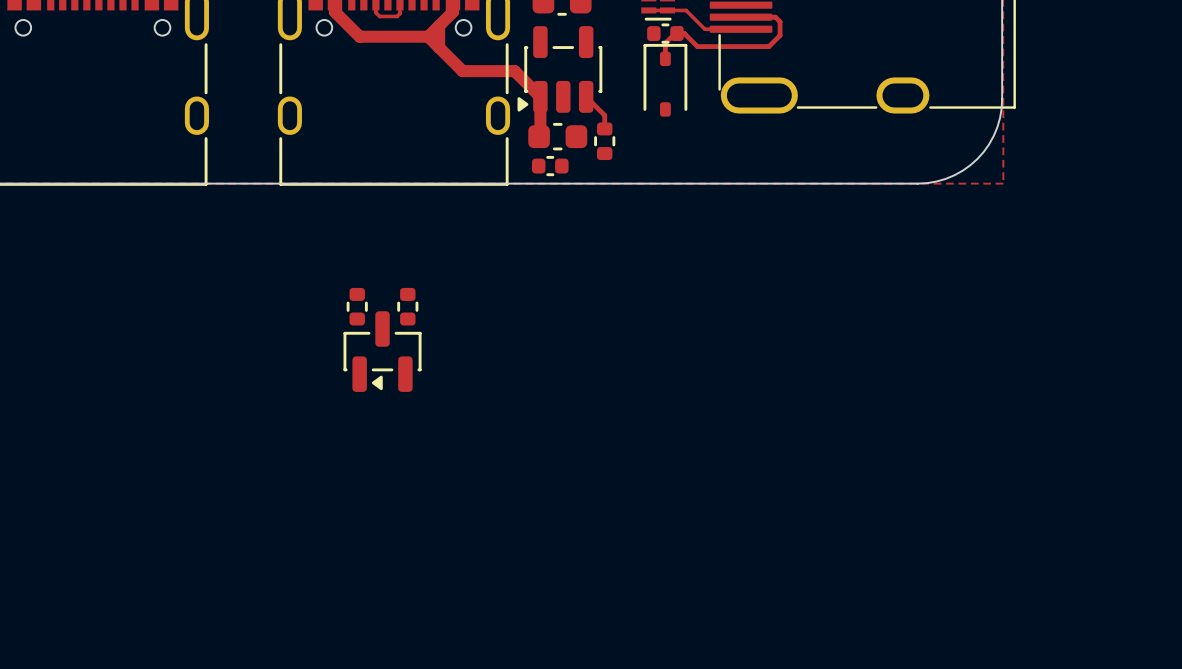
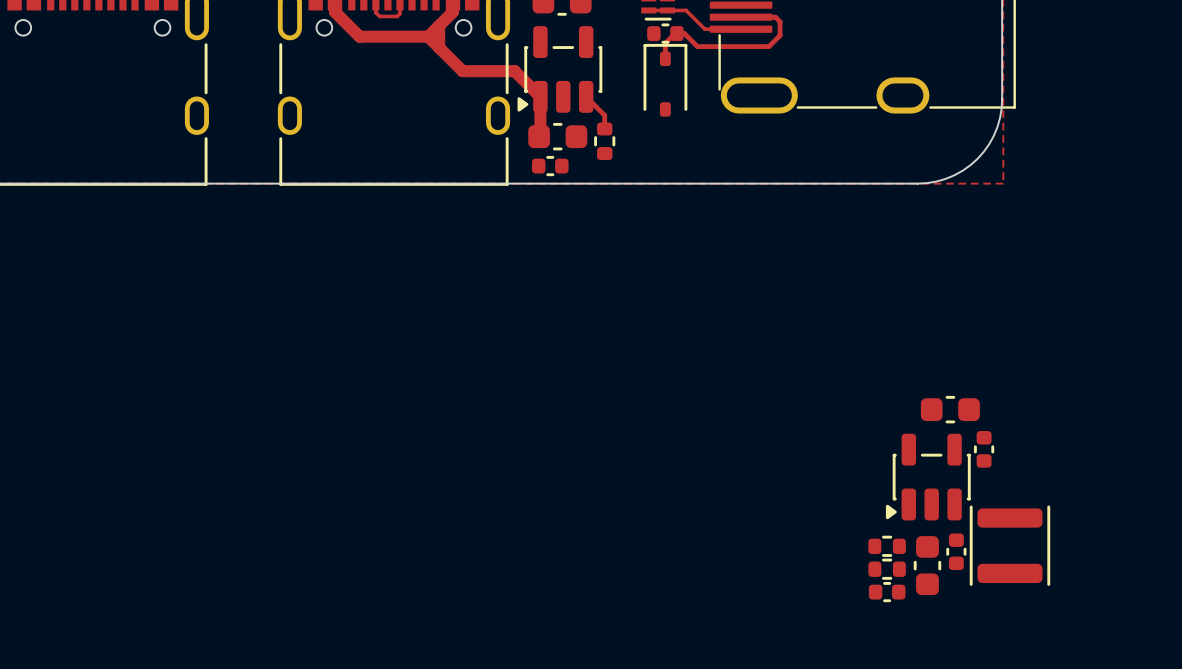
part: (357, 306) -> none
part: (407, 306) -> none
part: (382, 351) -> none
part: none -> (950, 409)
part: none -> (984, 449)
part: none -> (928, 477)
part: none -> (1009, 545)
part: none -> (887, 546)
part: none -> (956, 551)
part: none -> (927, 565)
part: none -> (887, 569)
part: none -> (887, 592)

